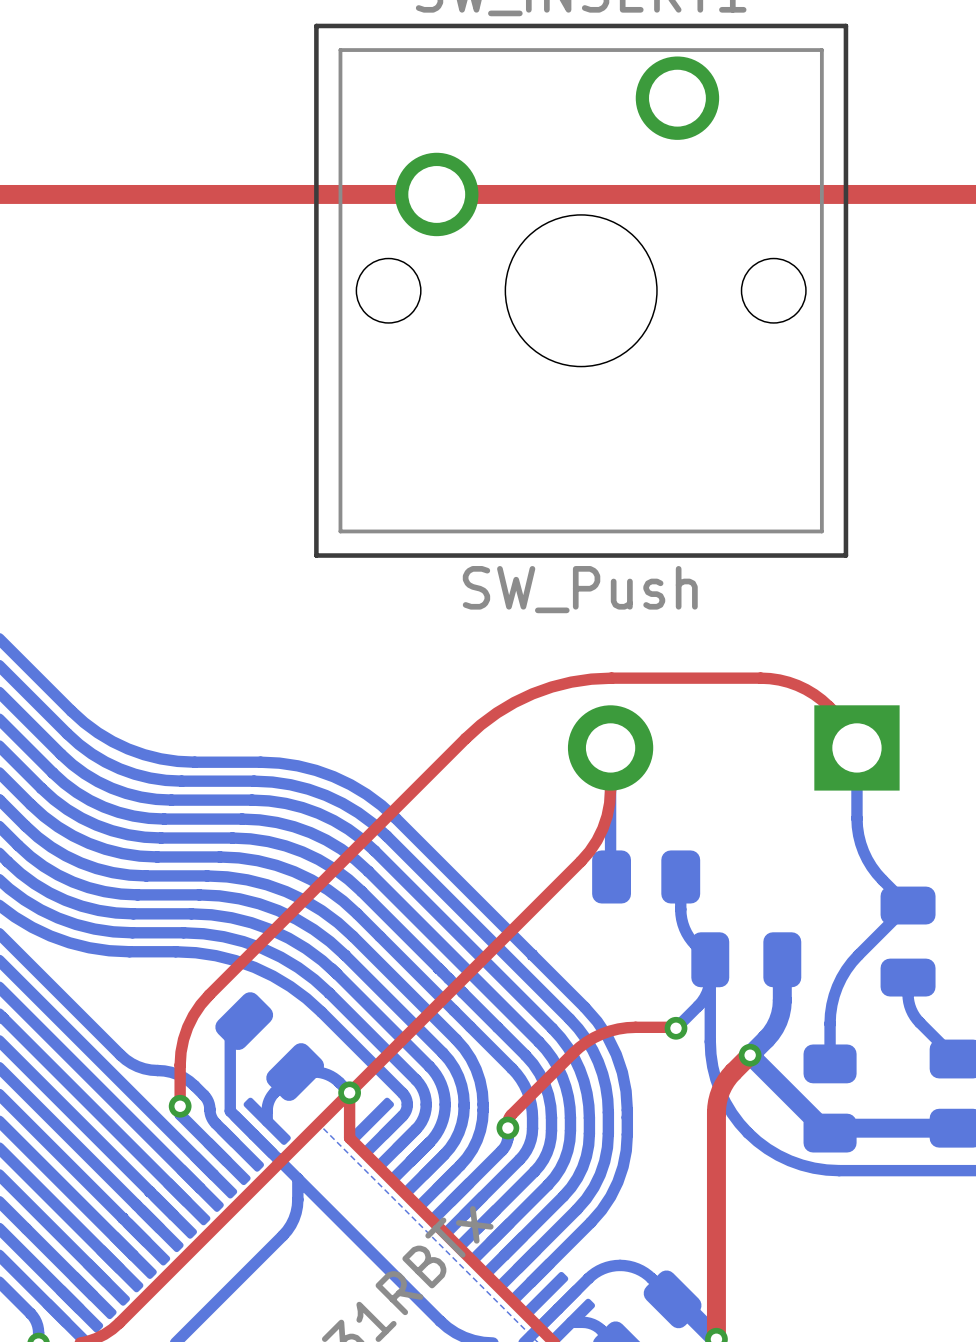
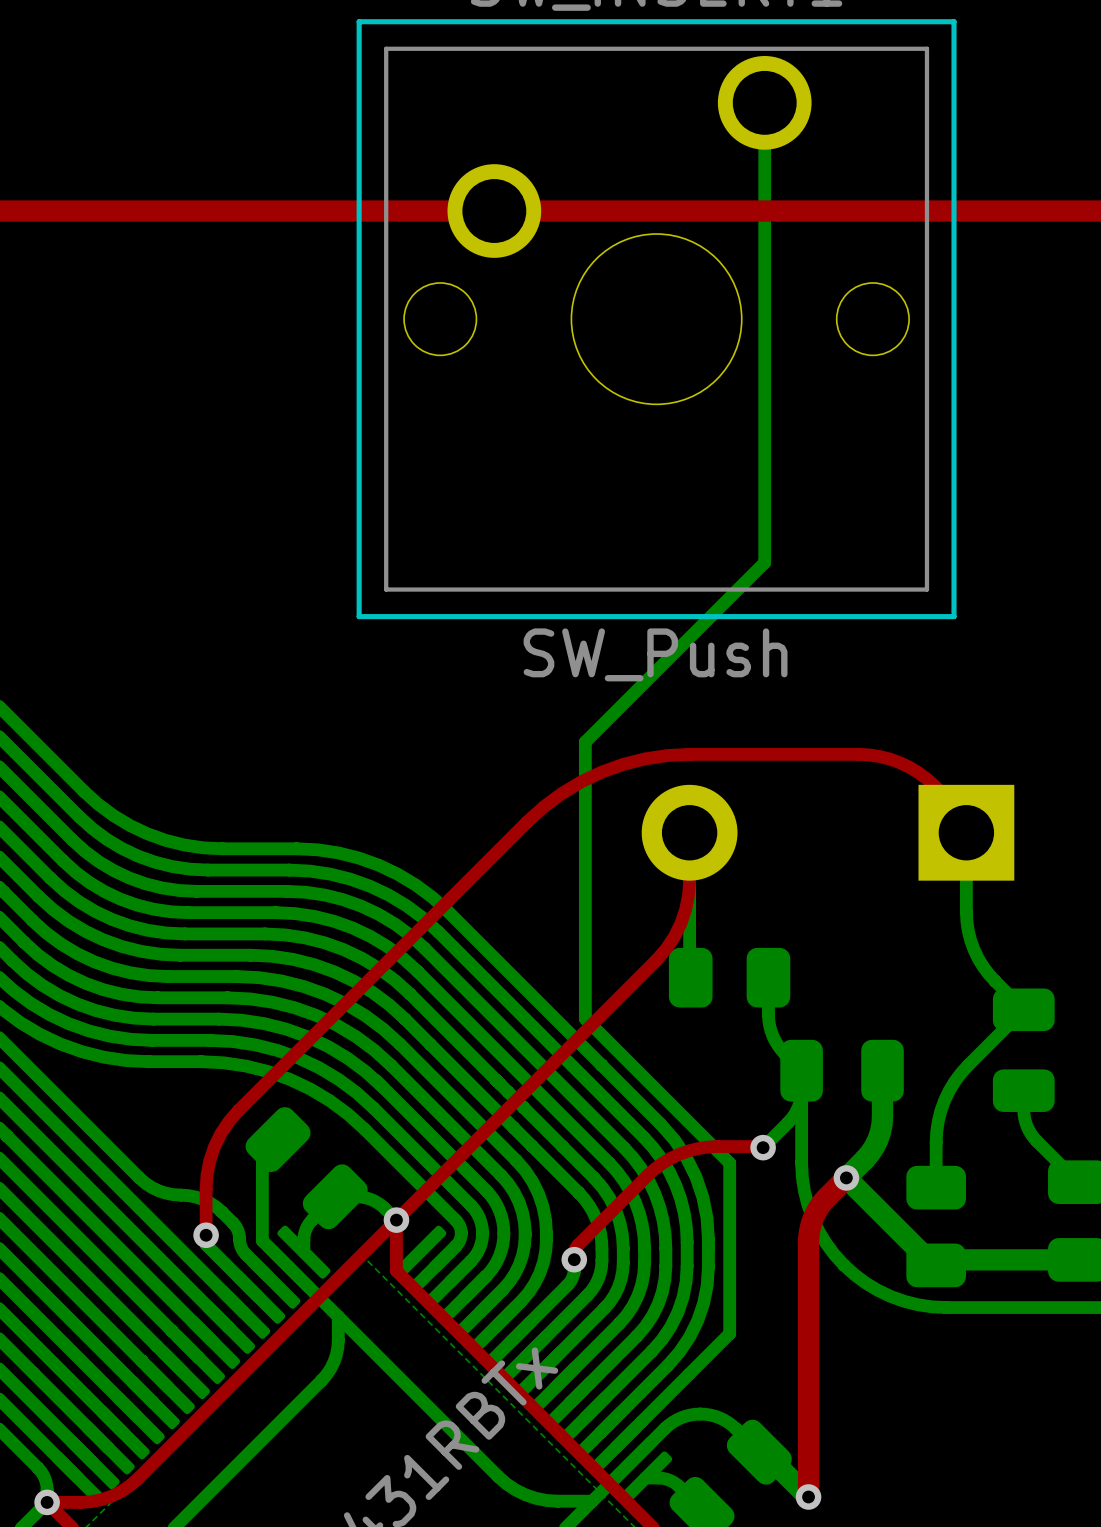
bottom track: none -> (764, 102) (764, 562) (585, 741) (585, 1018) (729, 1163) (729, 1333) (615, 1447)

